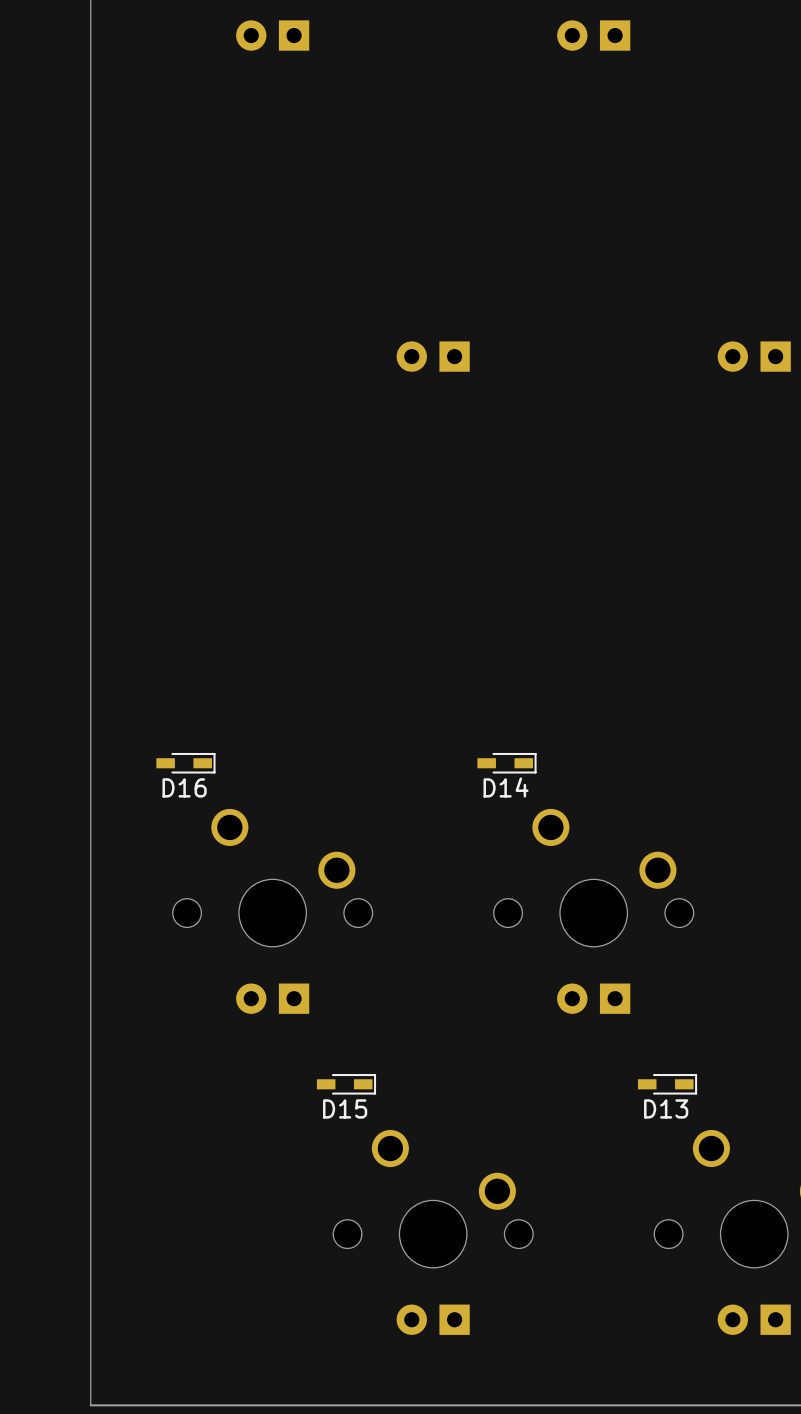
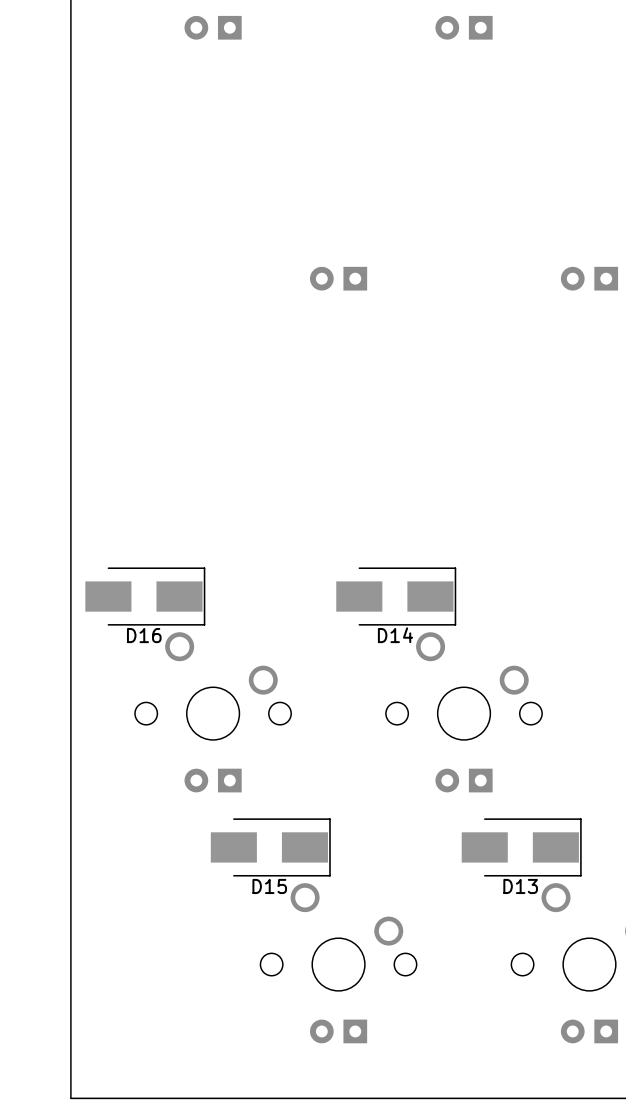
D16 footprint: [156, 752, 216, 774] -> [85, 567, 206, 626]
D14 footprint: [477, 752, 537, 774] -> [336, 567, 457, 626]
D15 footprint: [316, 1074, 377, 1095] -> [210, 818, 331, 877]
D13 footprint: [637, 1074, 698, 1095] -> [461, 818, 582, 877]

